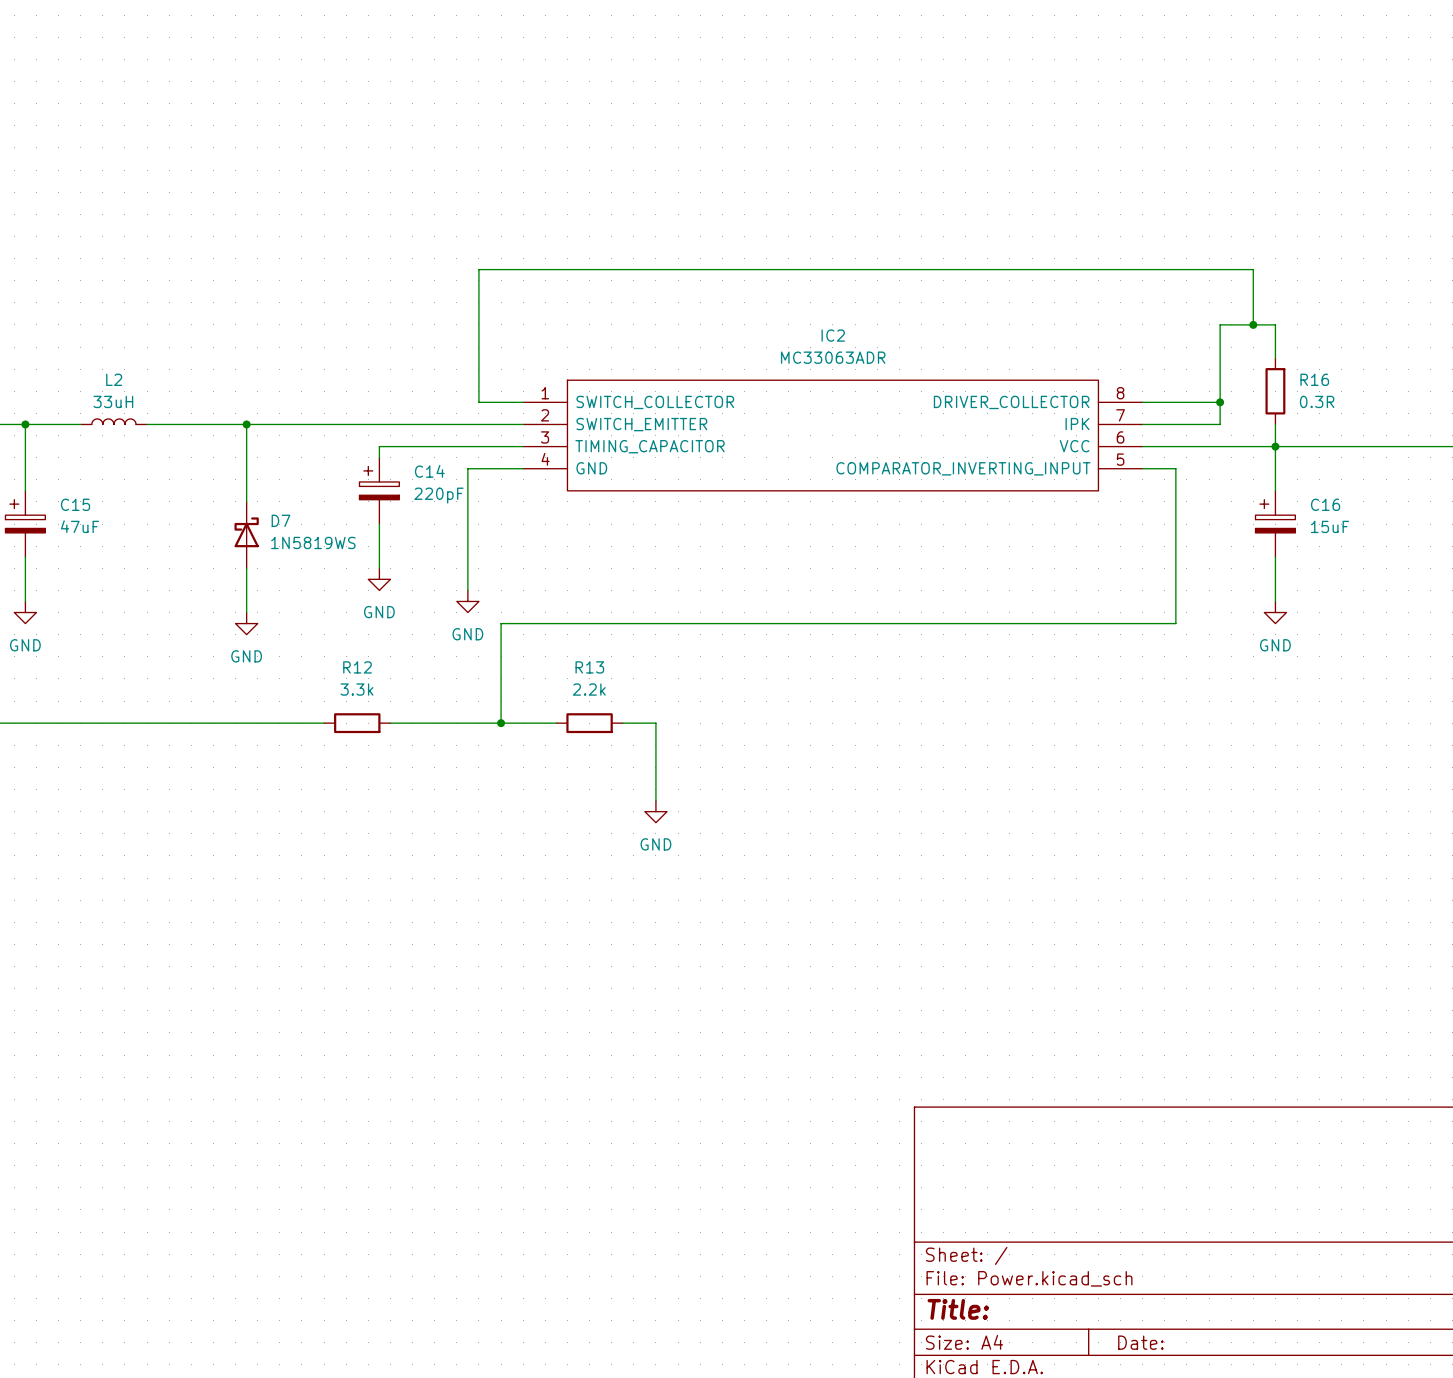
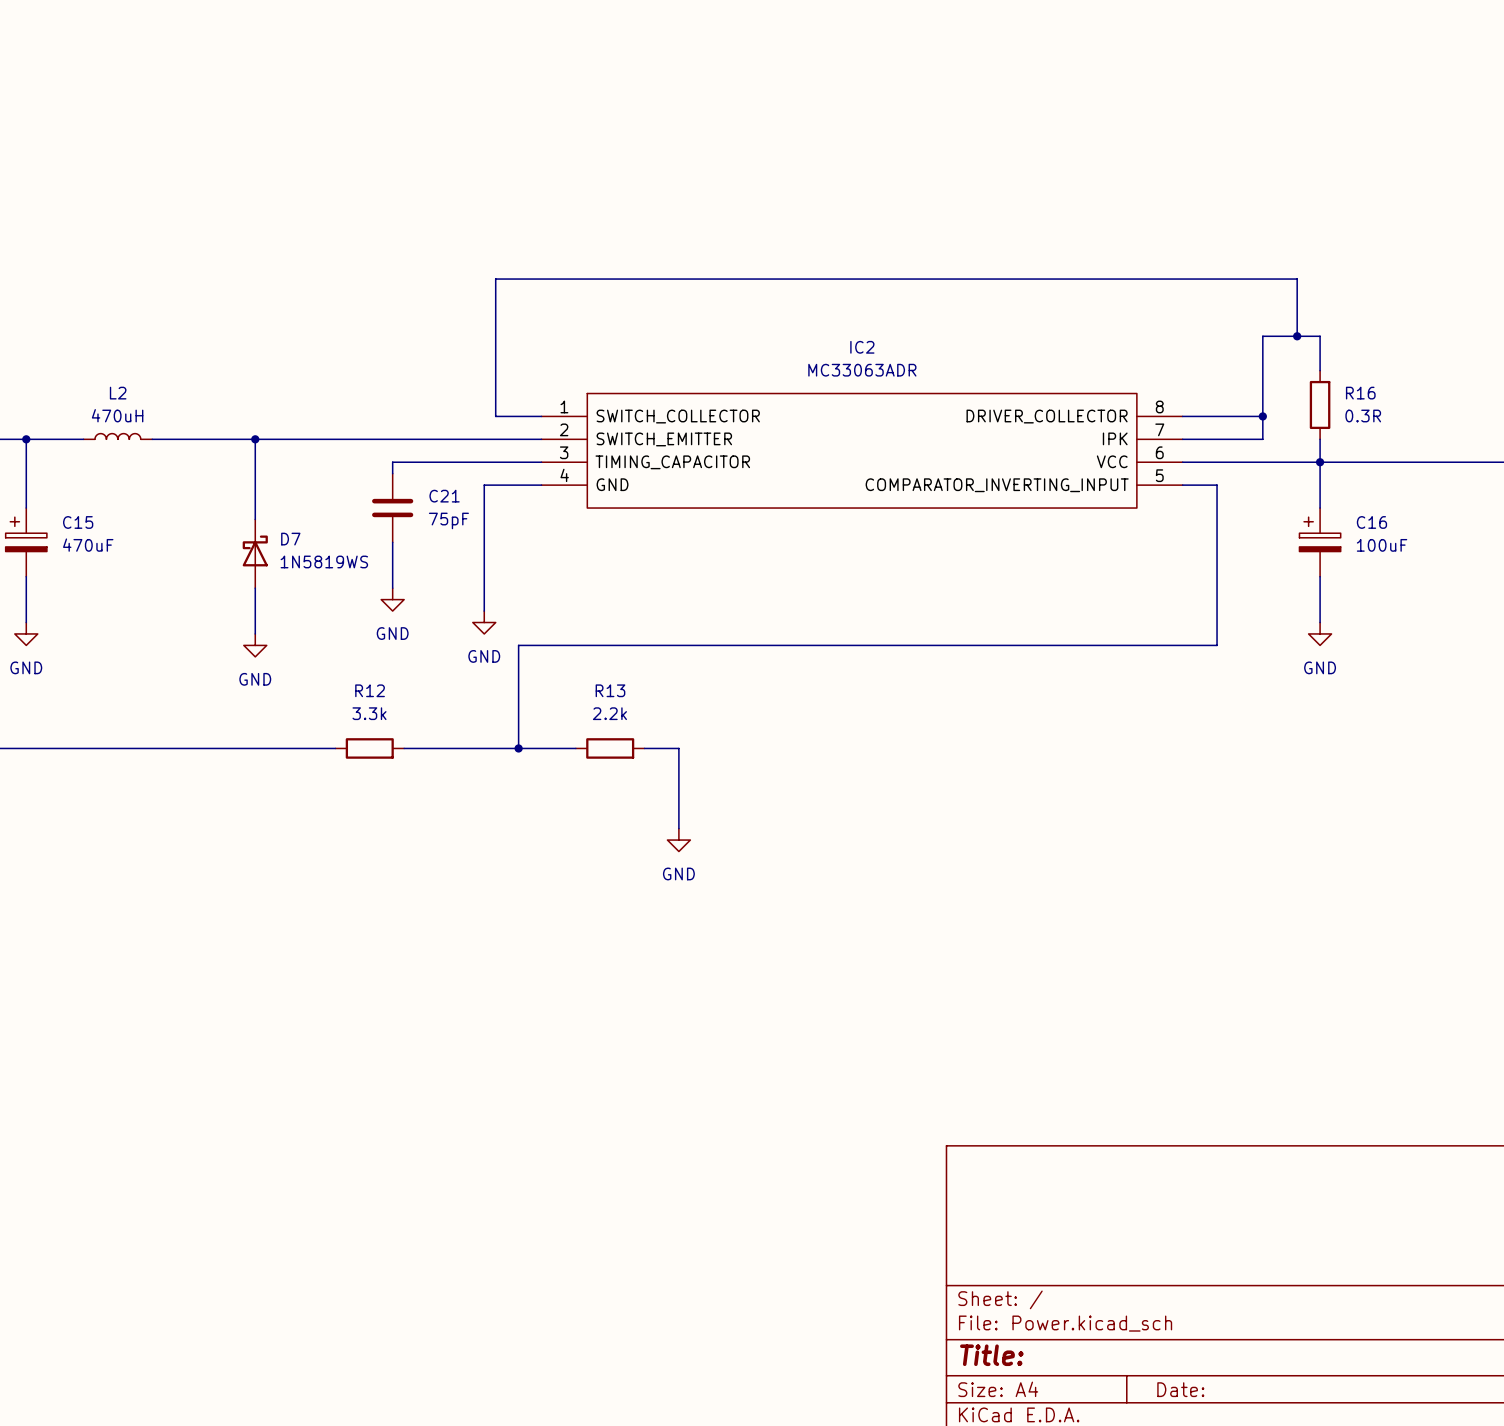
L2 value: 33uH (113, 401) -> 470uH (117, 415)
C14: 220pF (379, 490) -> none
C21: none -> 75pF (392, 508)
C15 value: 47uF (80, 526) -> 470uF (88, 545)
C16 value: 15uF (1330, 526) -> 100uF (1382, 545)

